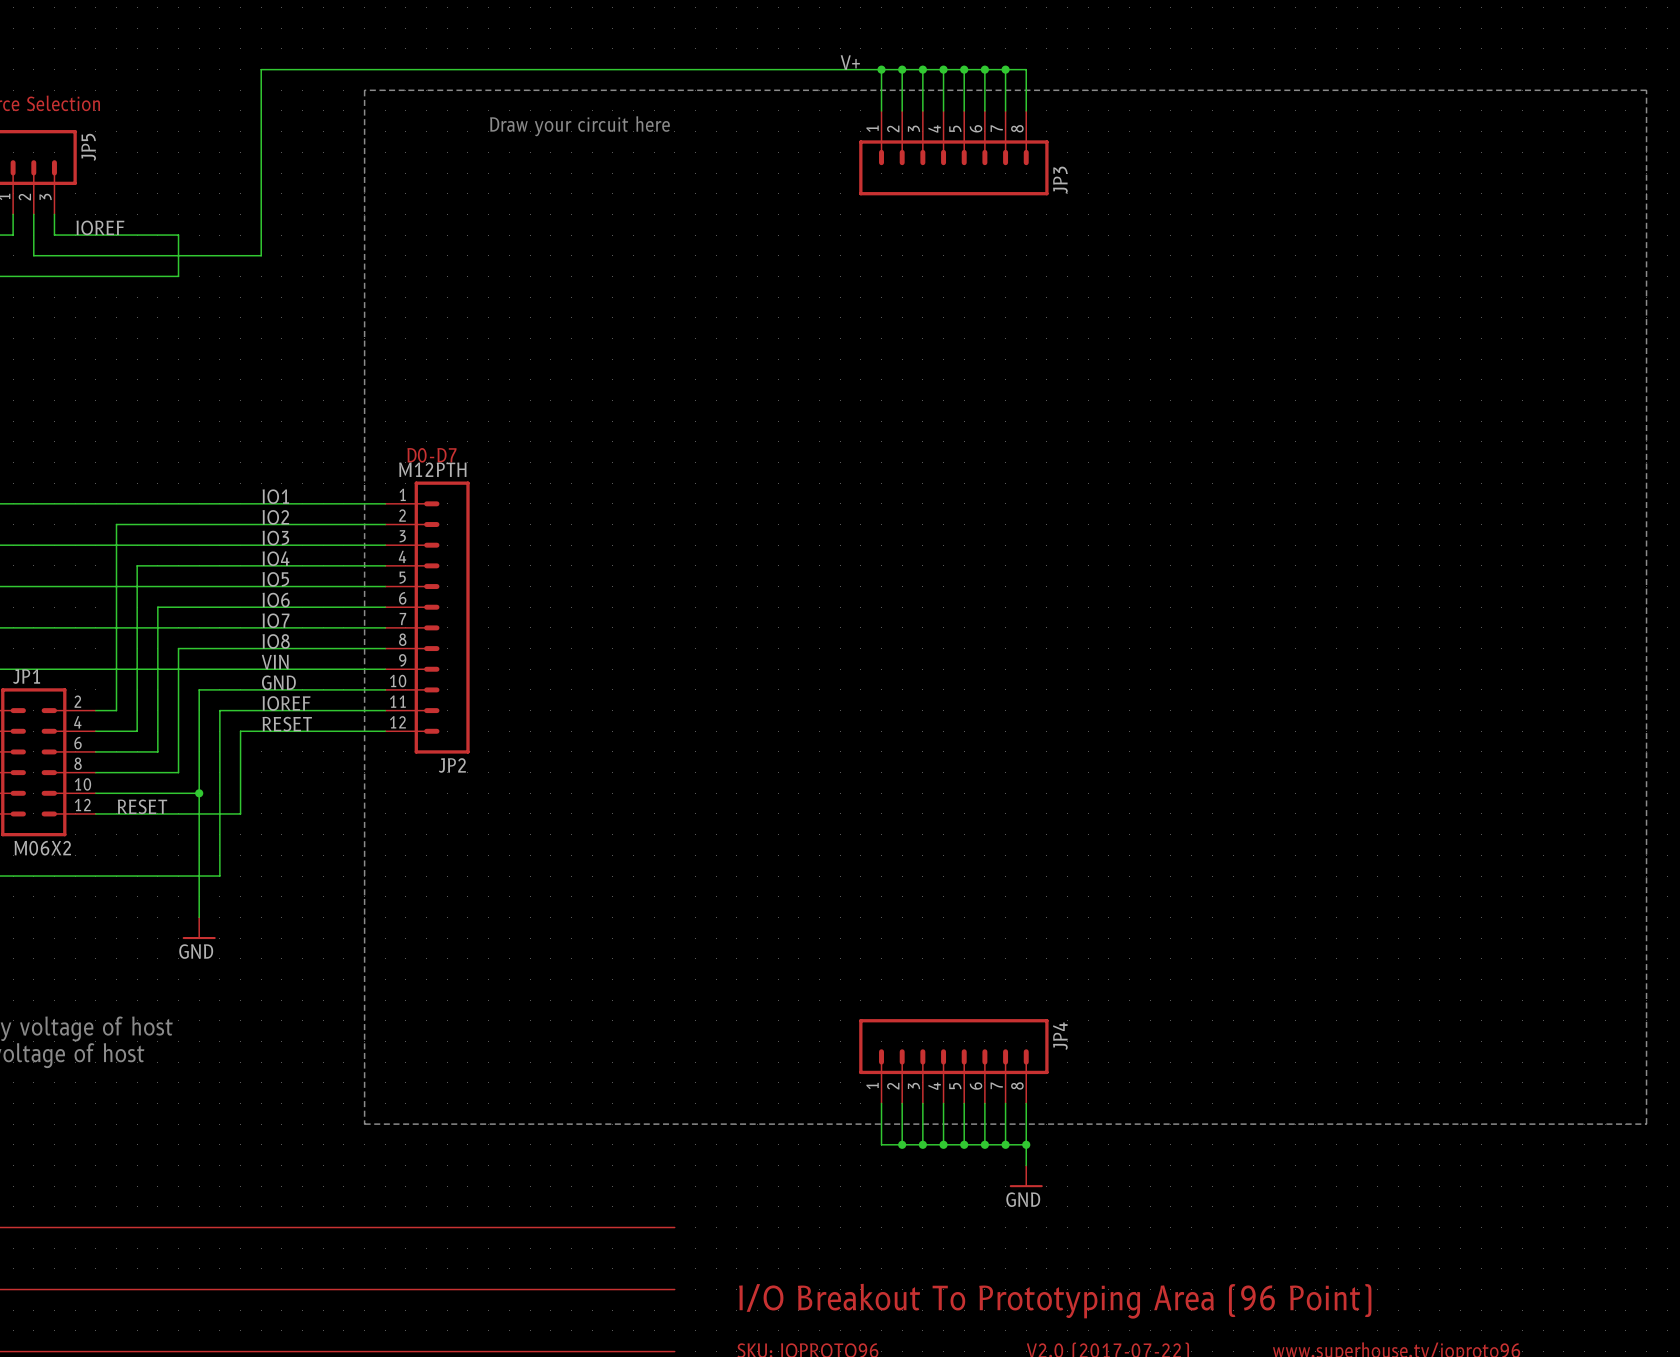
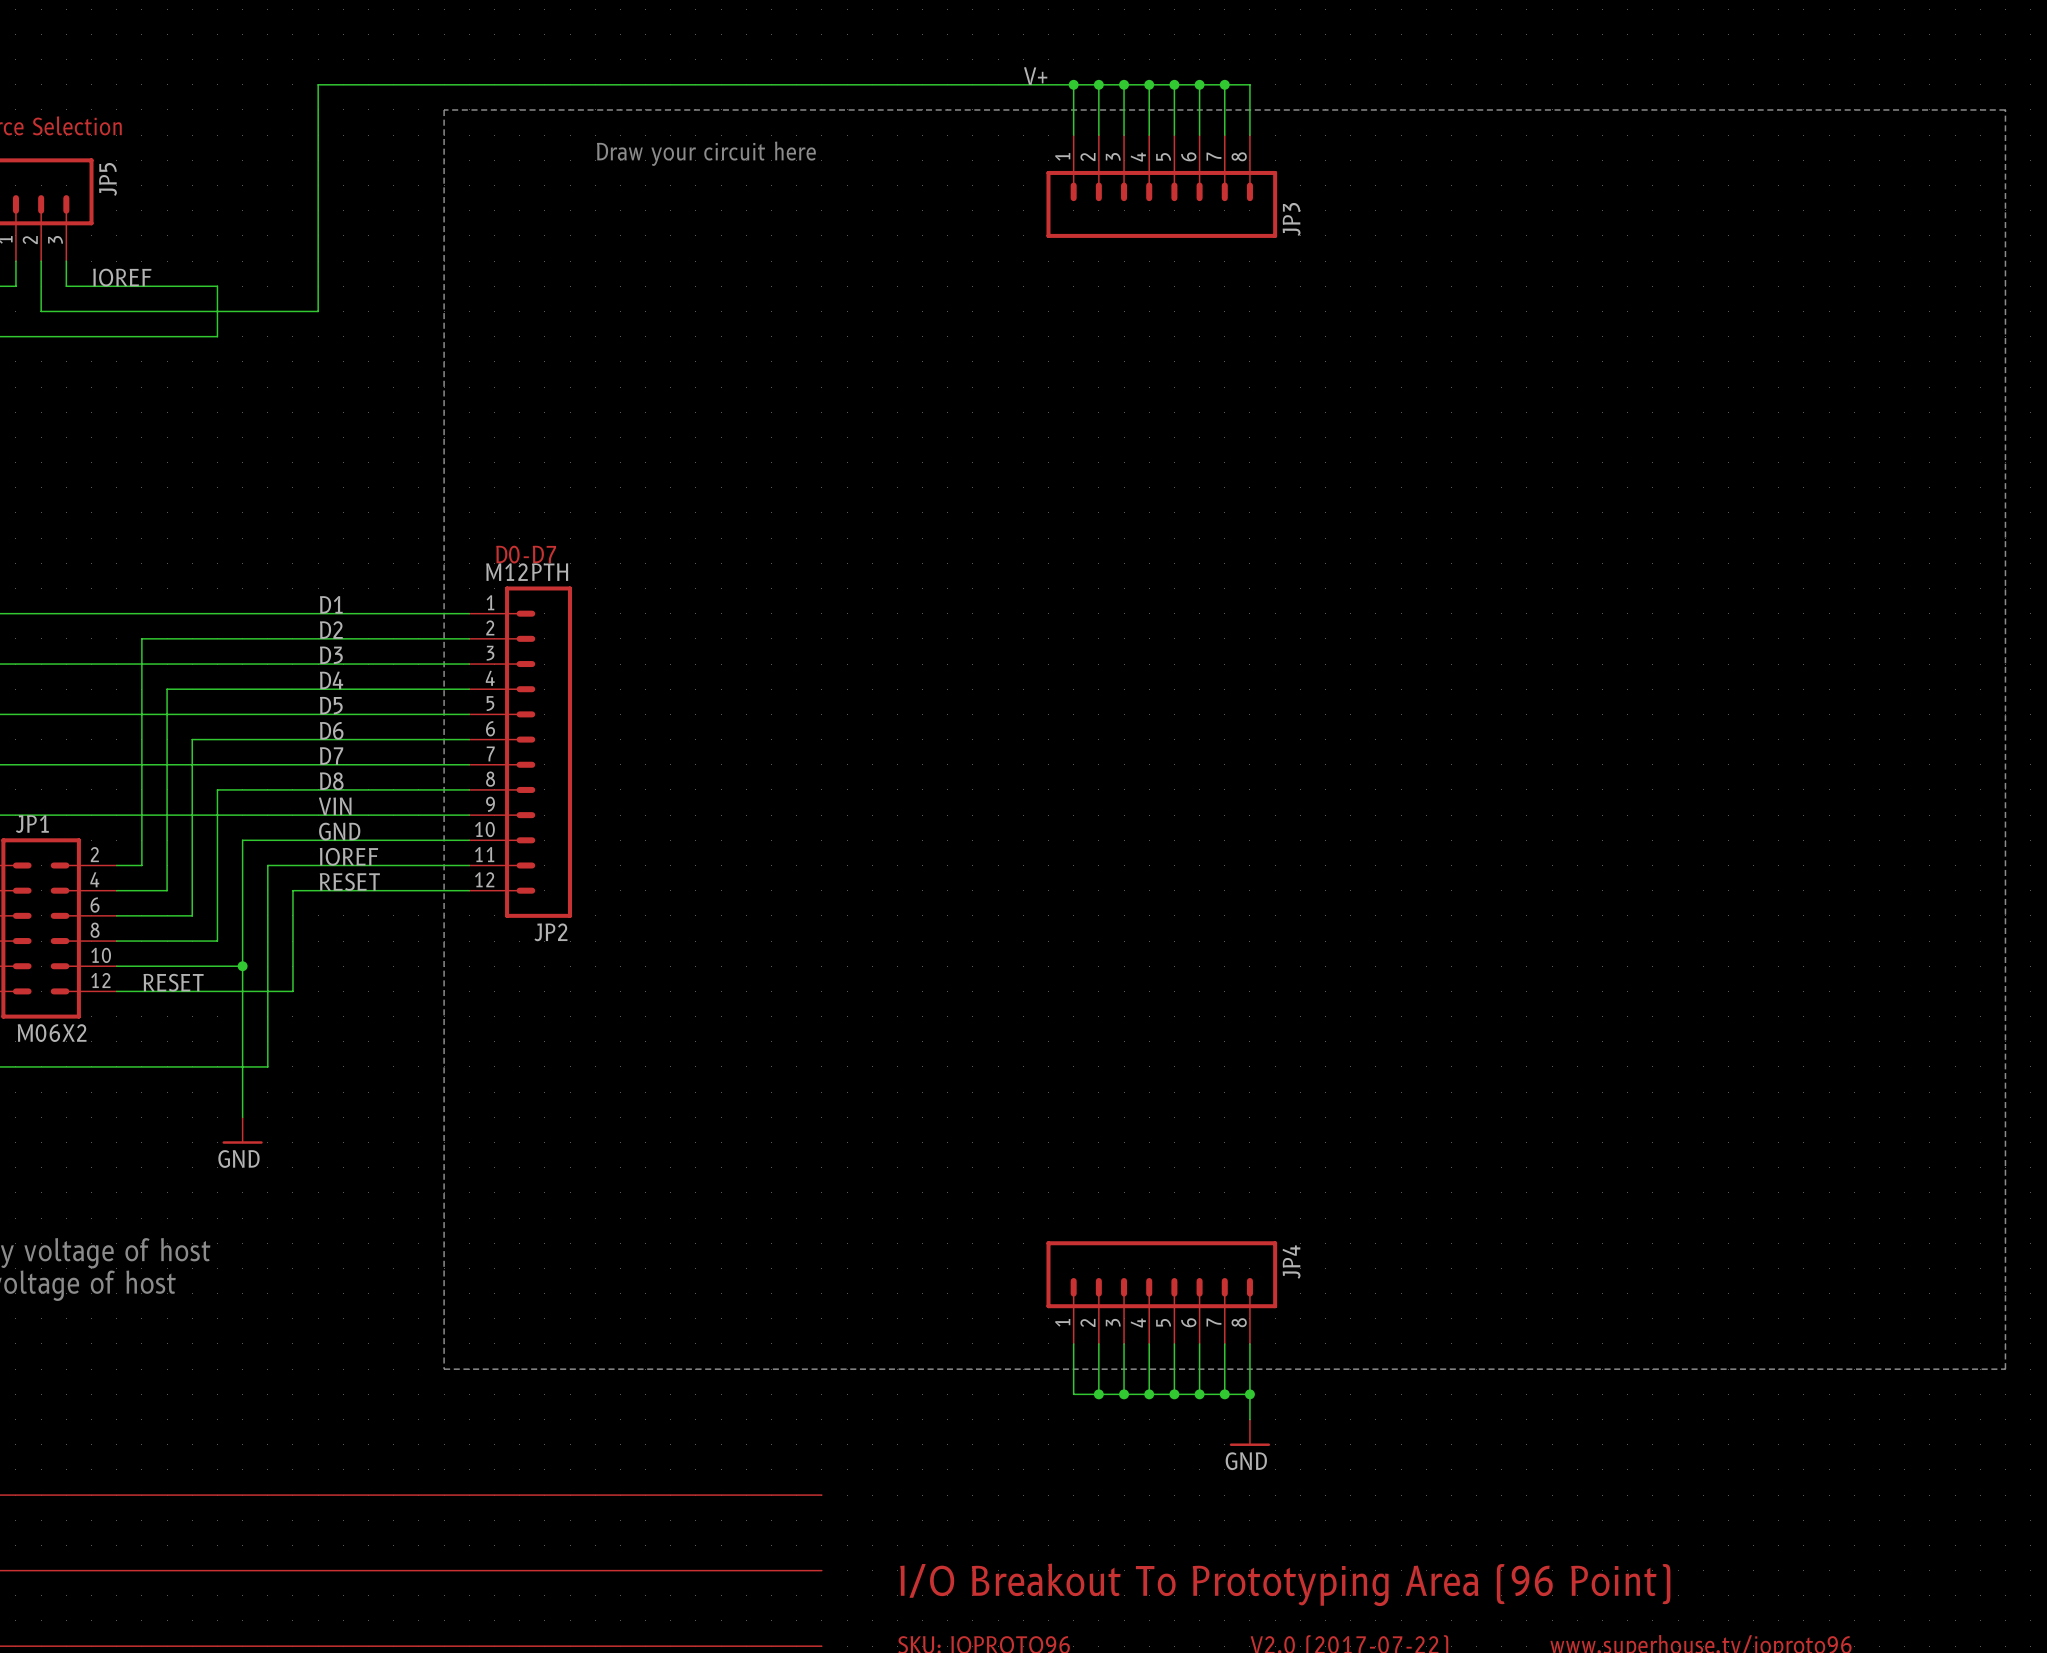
label: IO1 (275, 496) -> D1 (331, 604)
label: IO2 (275, 517) -> D2 (331, 630)
label: IO3 (275, 538) -> D3 (331, 655)
label: IO4 (276, 558) -> D4 (331, 680)
label: IO5 (275, 579) -> D5 (331, 705)
label: IO6 (276, 600) -> D6 (331, 730)
label: IO7 (276, 620) -> D7 (331, 756)
label: IO8 (276, 641) -> D8 (331, 781)

